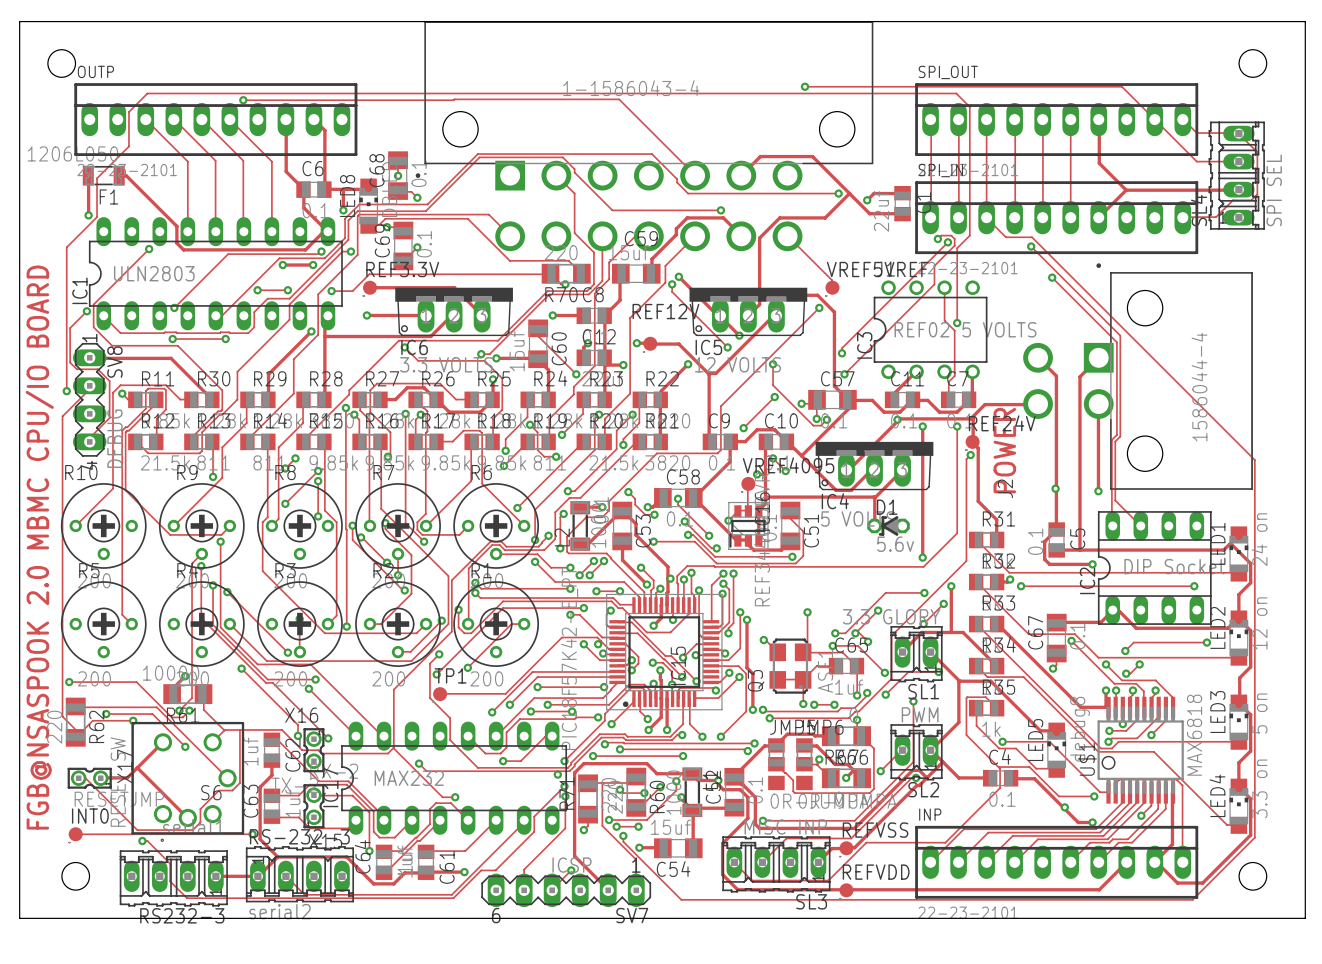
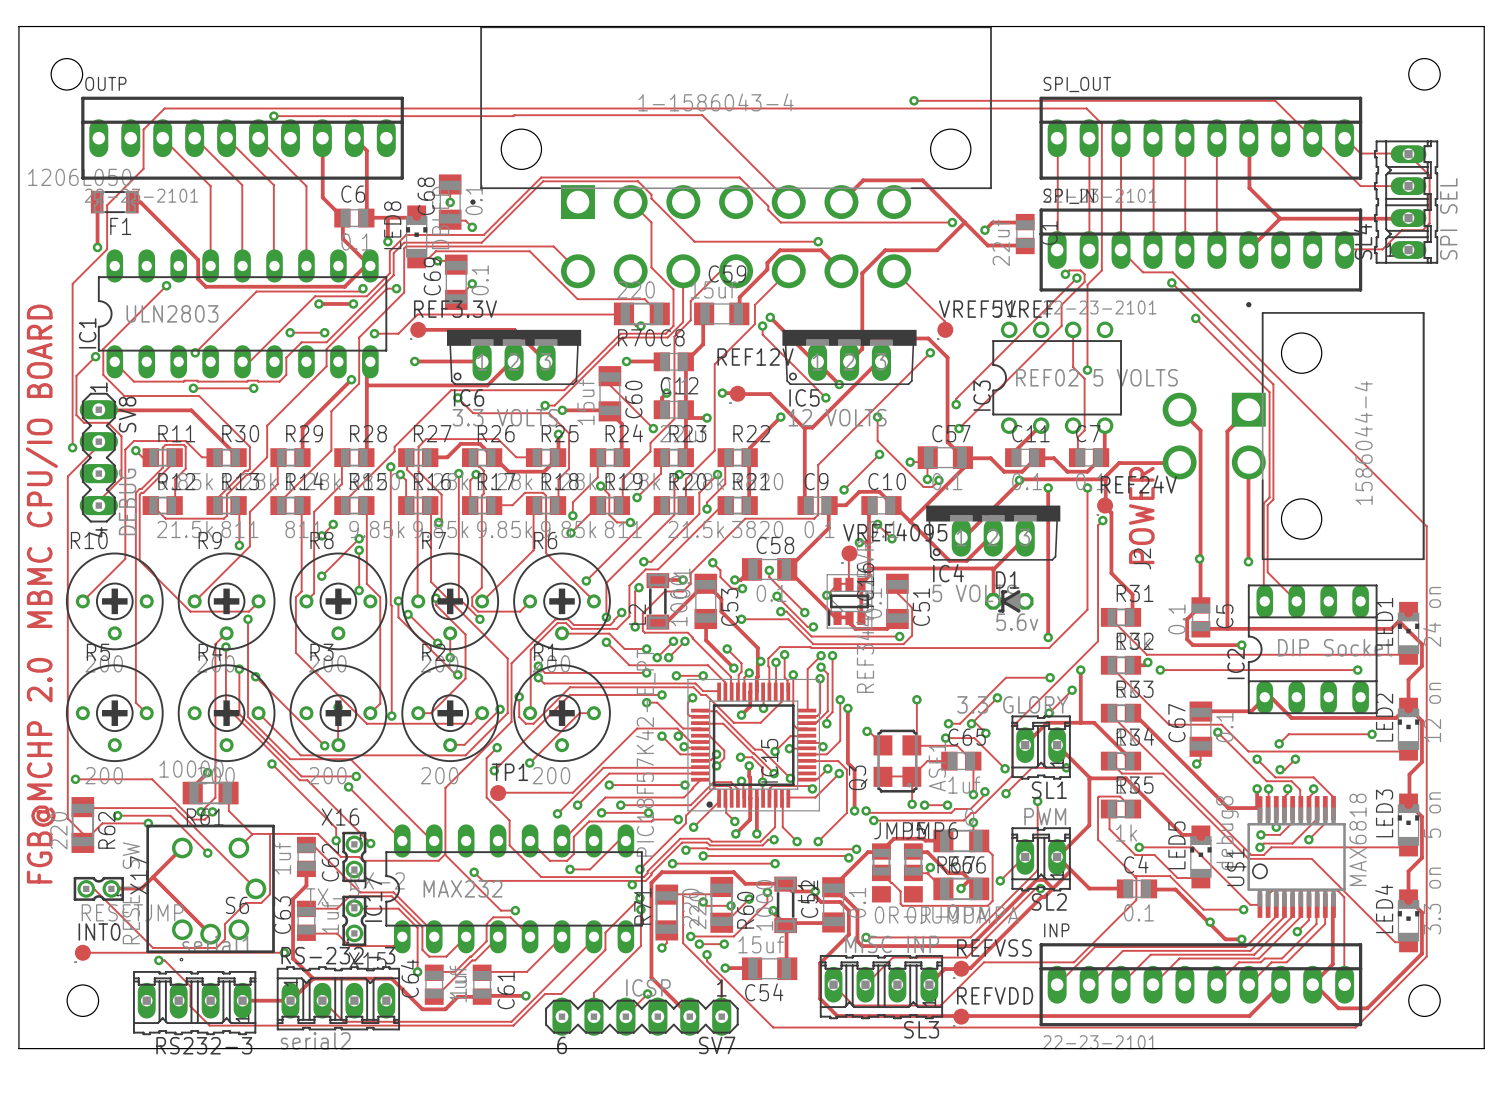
text: FGB@NSASPOOK 2.0 (39, 697) -> FGB@MCHP 2.0 (41, 770)

